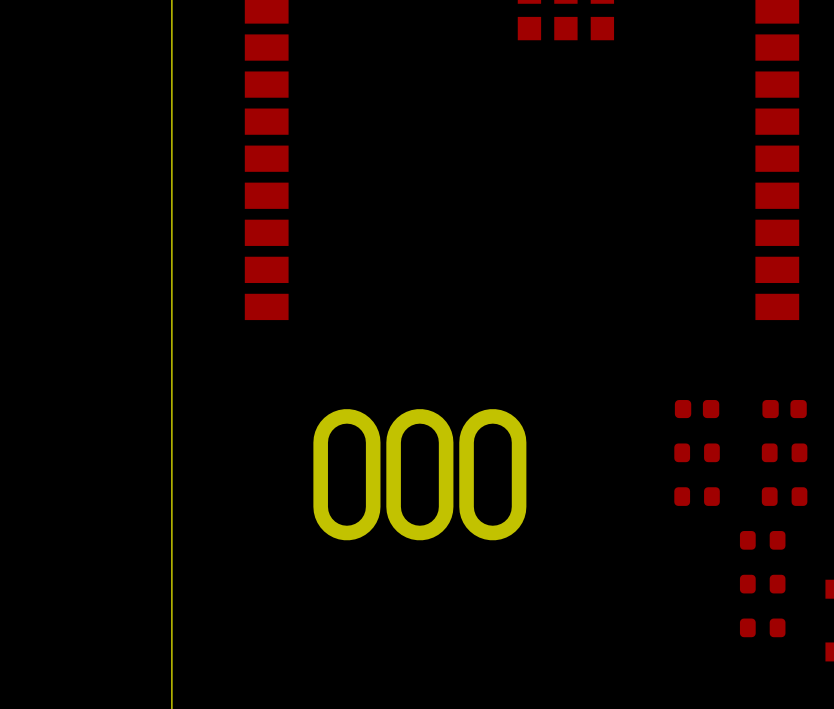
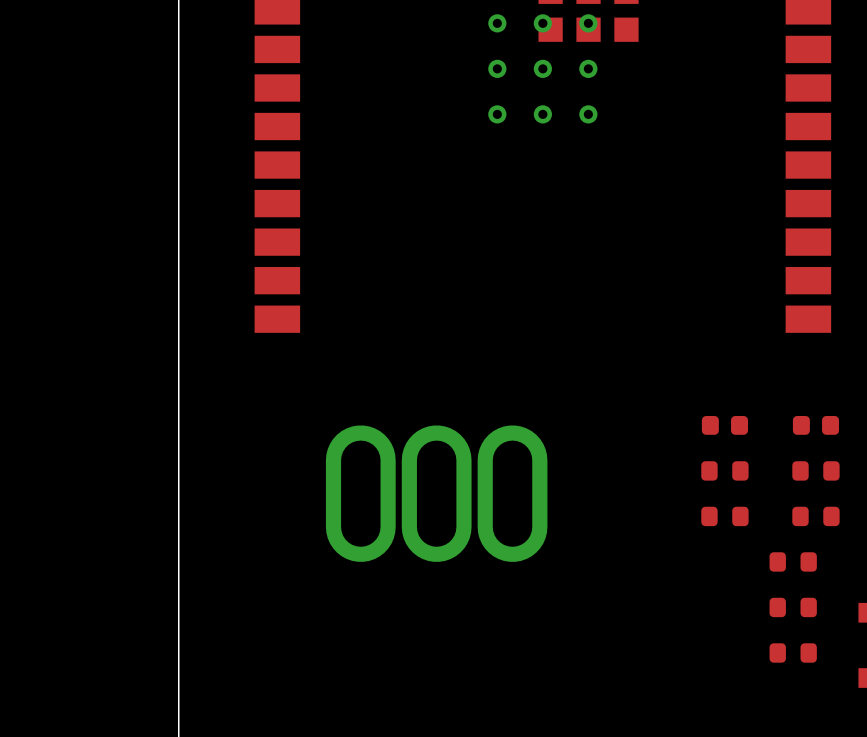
via: none -> (497, 23)
via: none -> (542, 23)
via: none -> (588, 23)
via: none -> (497, 68)
via: none -> (542, 68)
via: none -> (588, 68)
via: none -> (497, 114)
via: none -> (542, 114)
via: none -> (588, 114)

